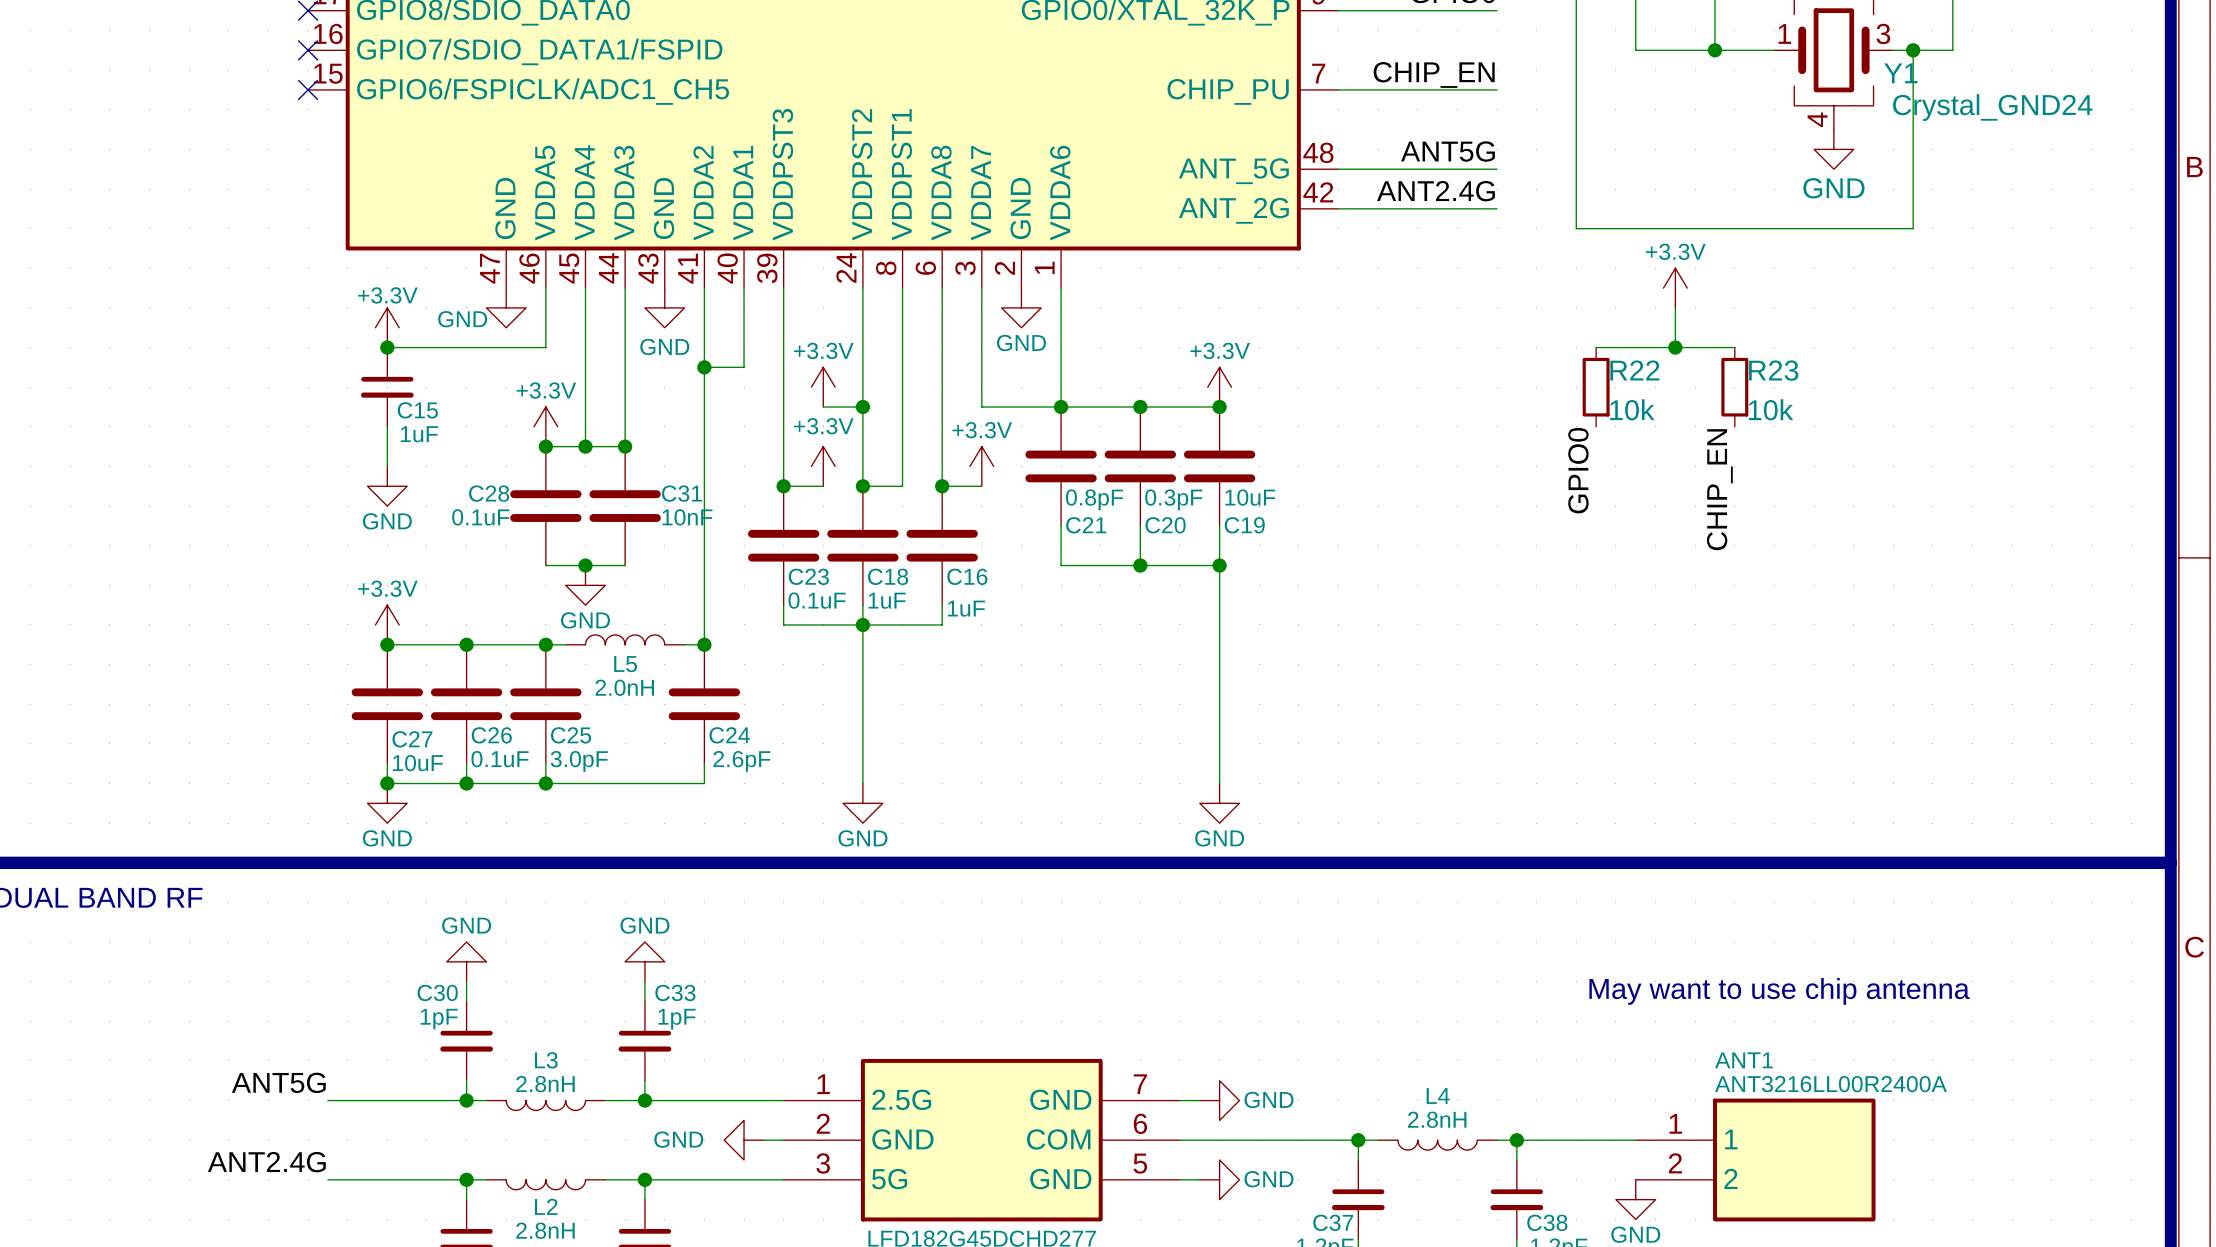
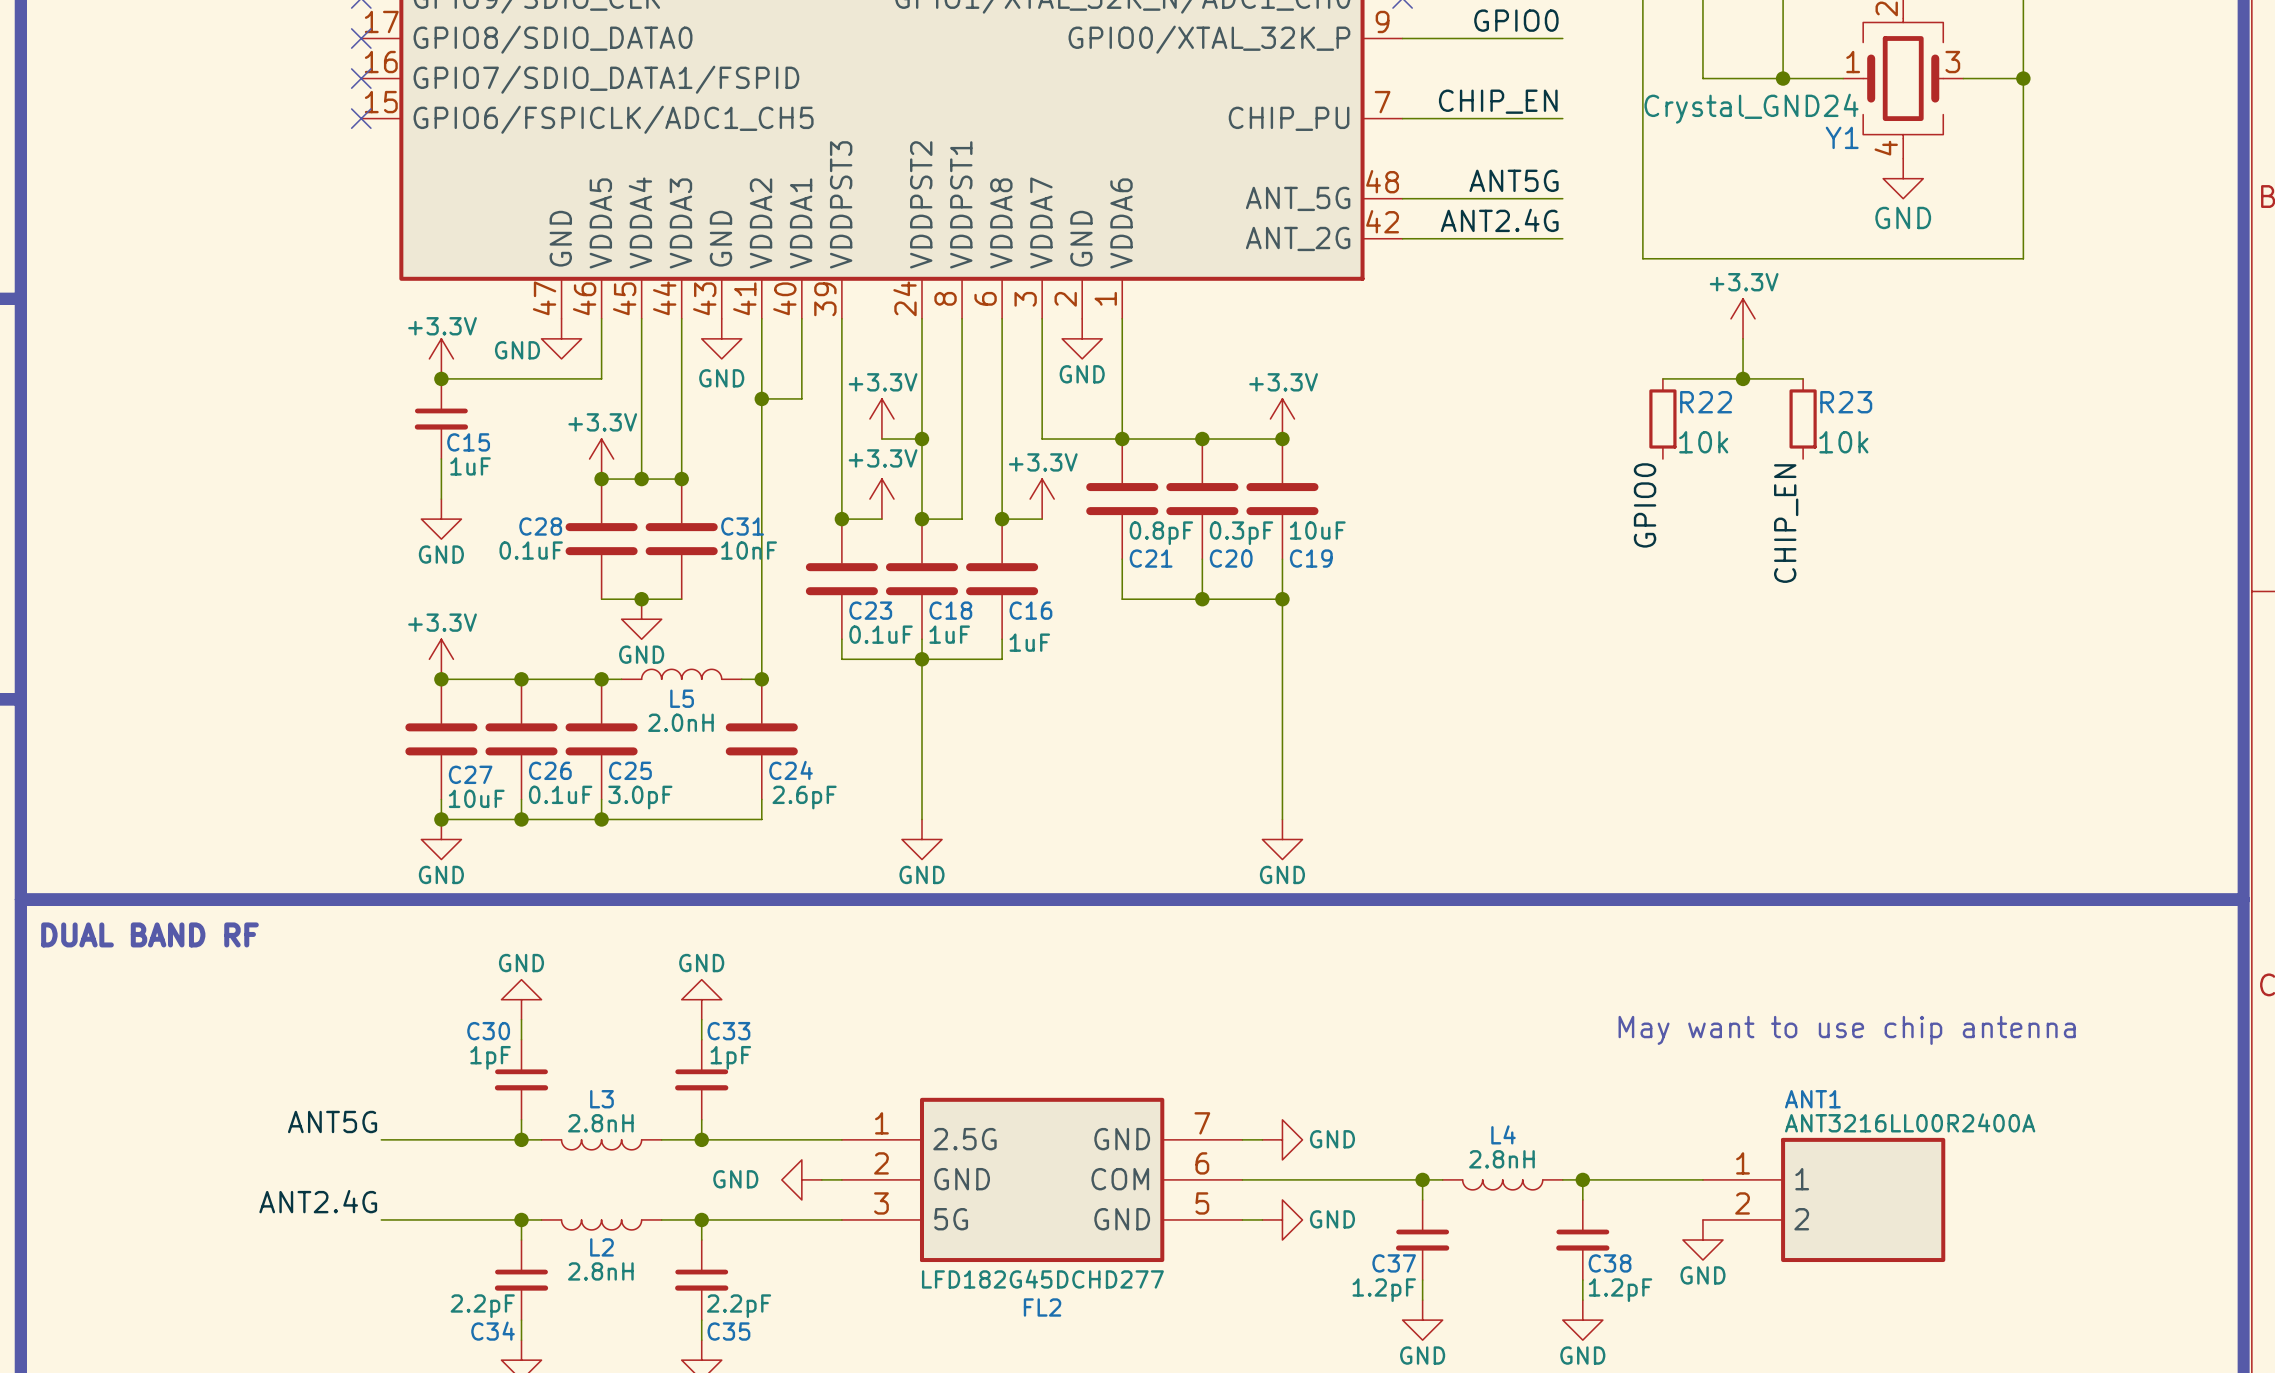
wire: (1913, 50) (1913, 228) -> (2023, 78) (2023, 258) (1983, 258)
junction position: (1913, 50) -> (2023, 78)
Y1 name position: Y1 (1900, 73) -> Y1 (1842, 137)
Y1 value position: Crystal_GND24 (1992, 107) -> Crystal_GND24 (1751, 108)

